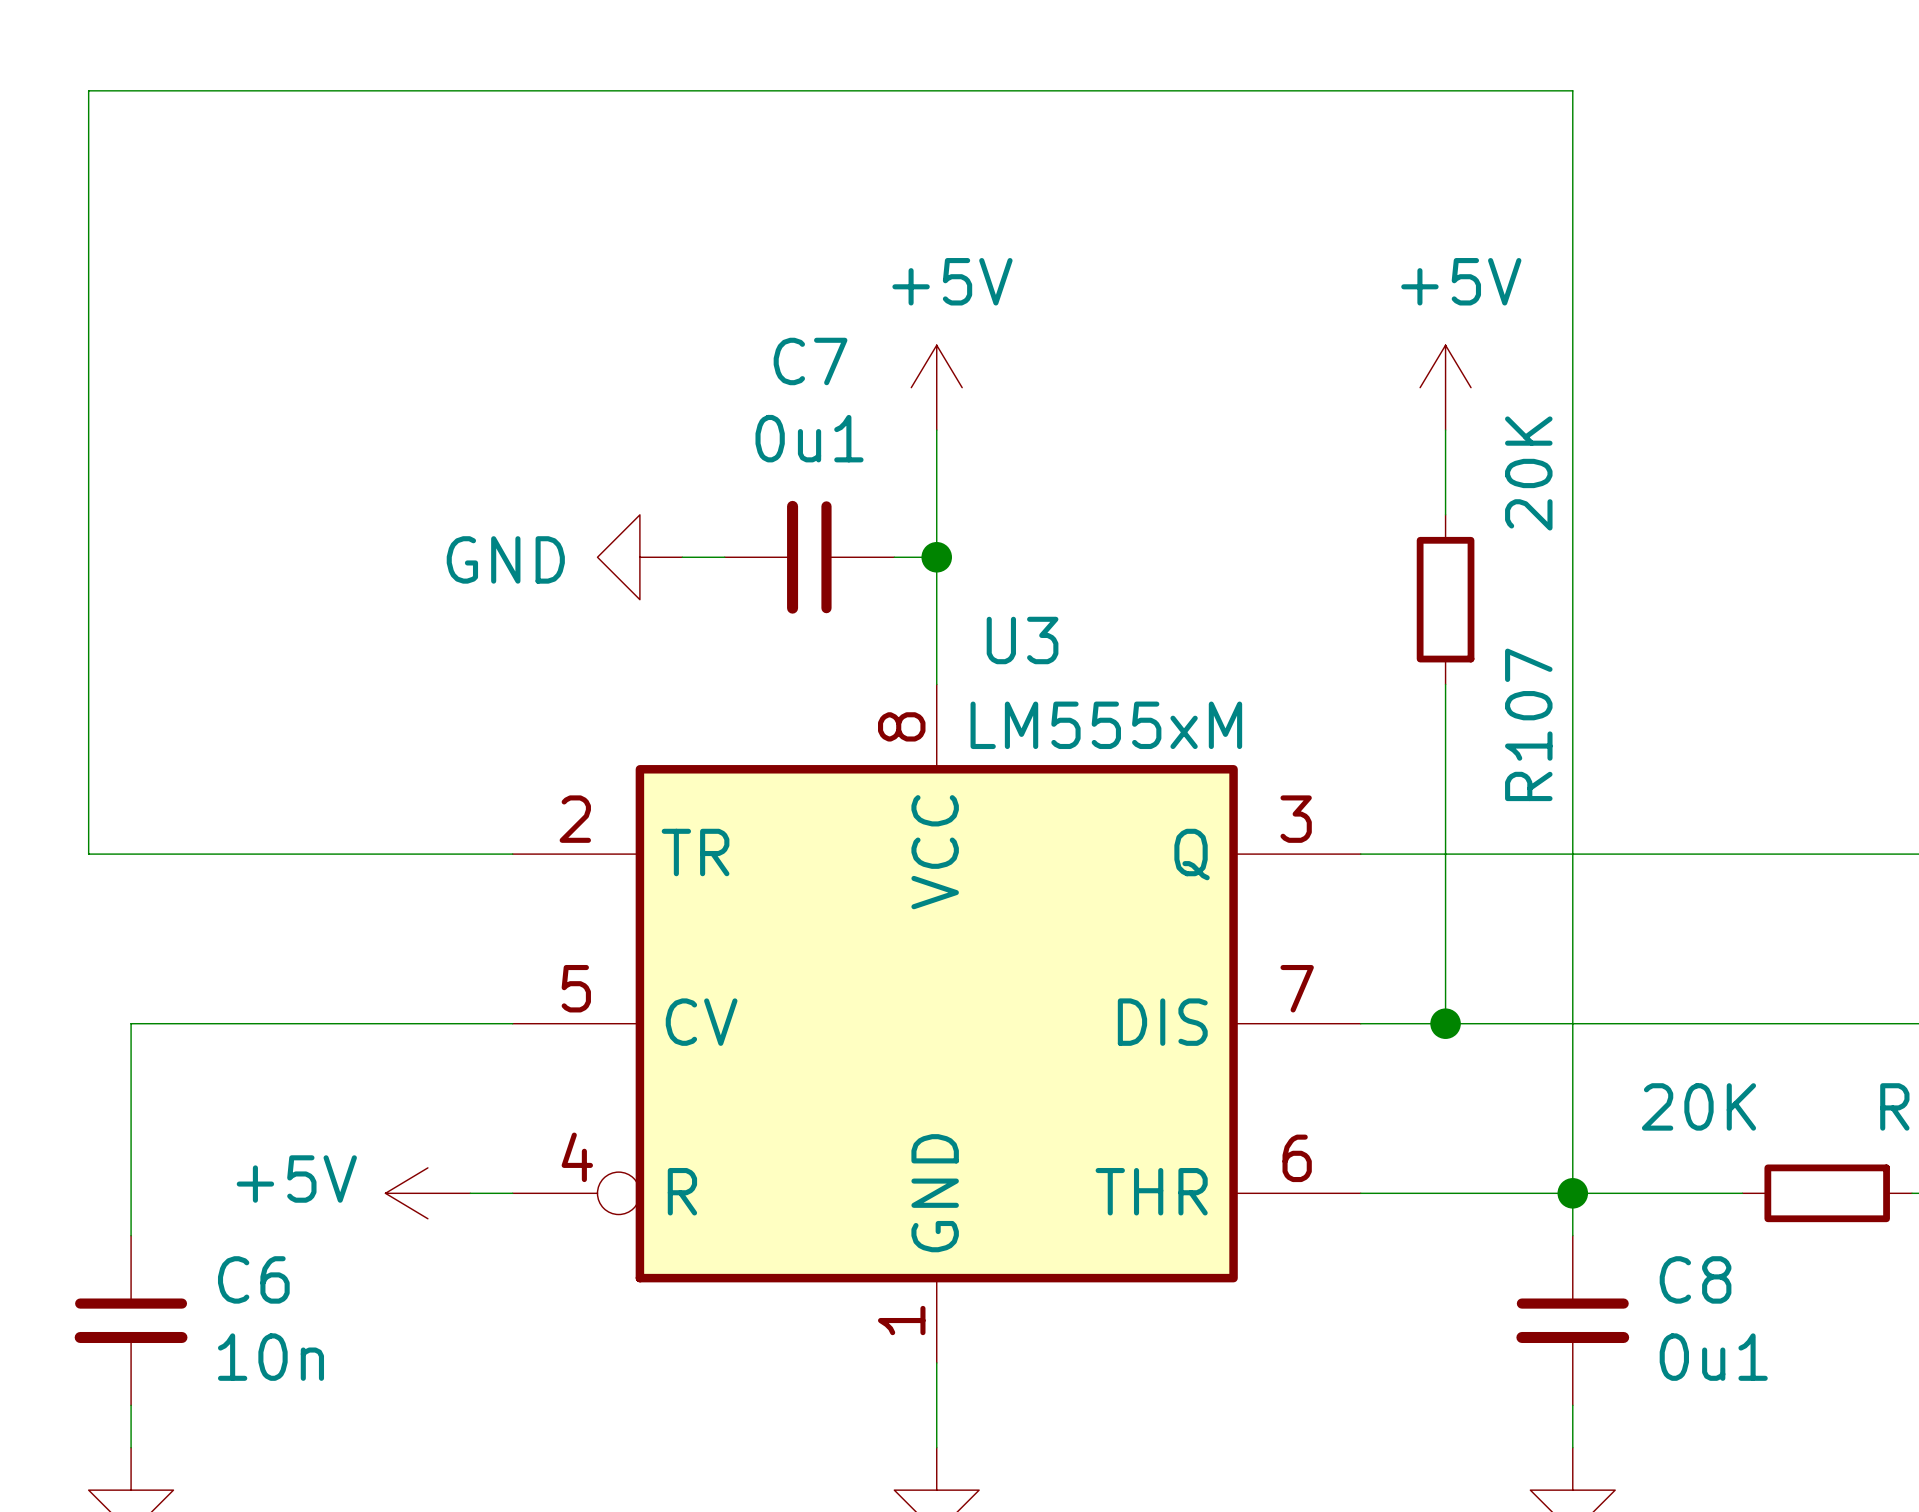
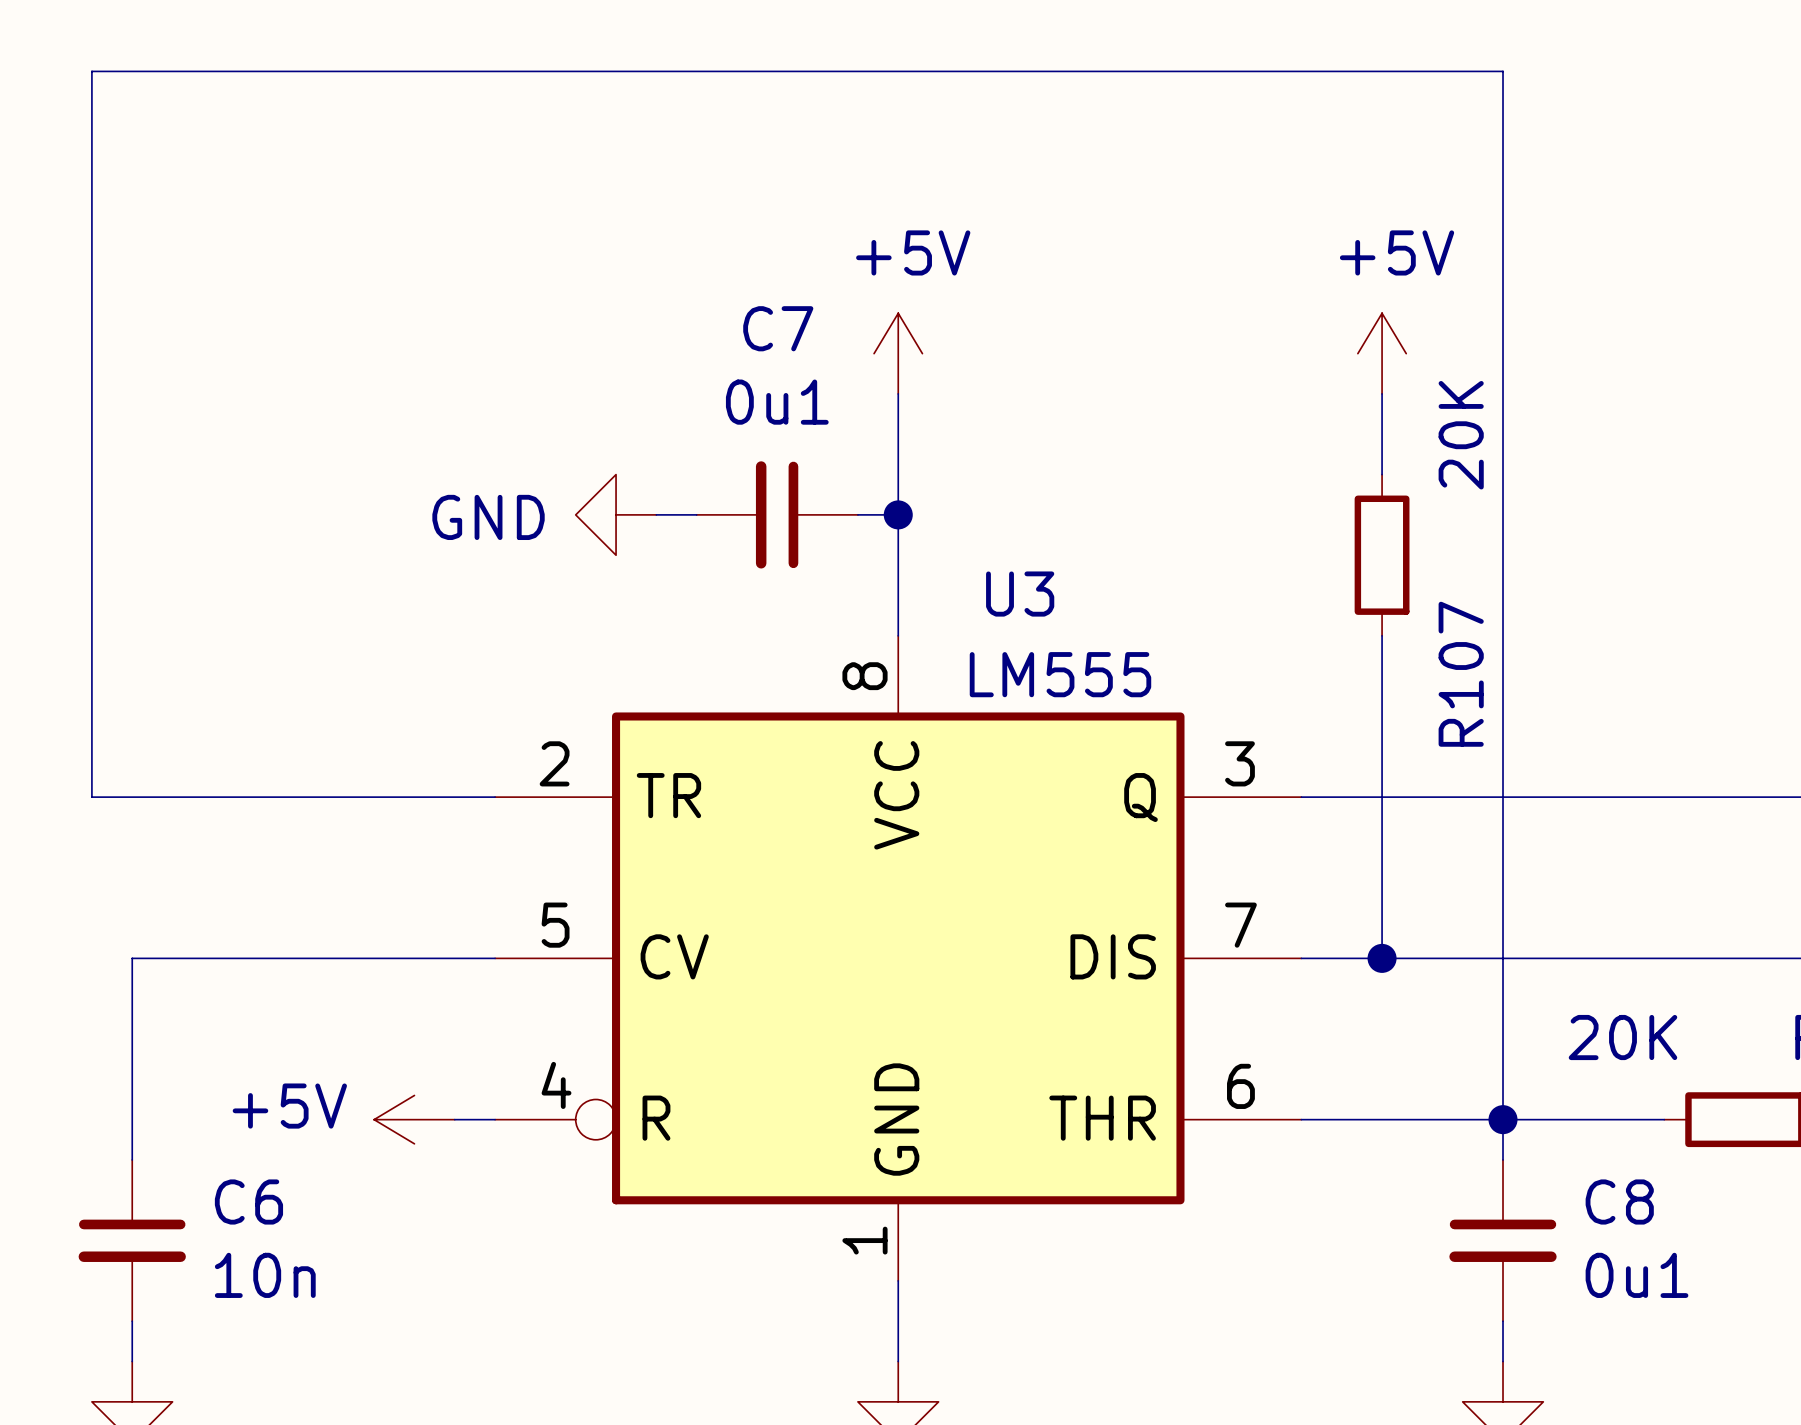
U3 name position: U3 (1022, 640) -> U3 (1020, 594)
U3 value: LM555xM (1106, 725) -> LM555 (1060, 674)

